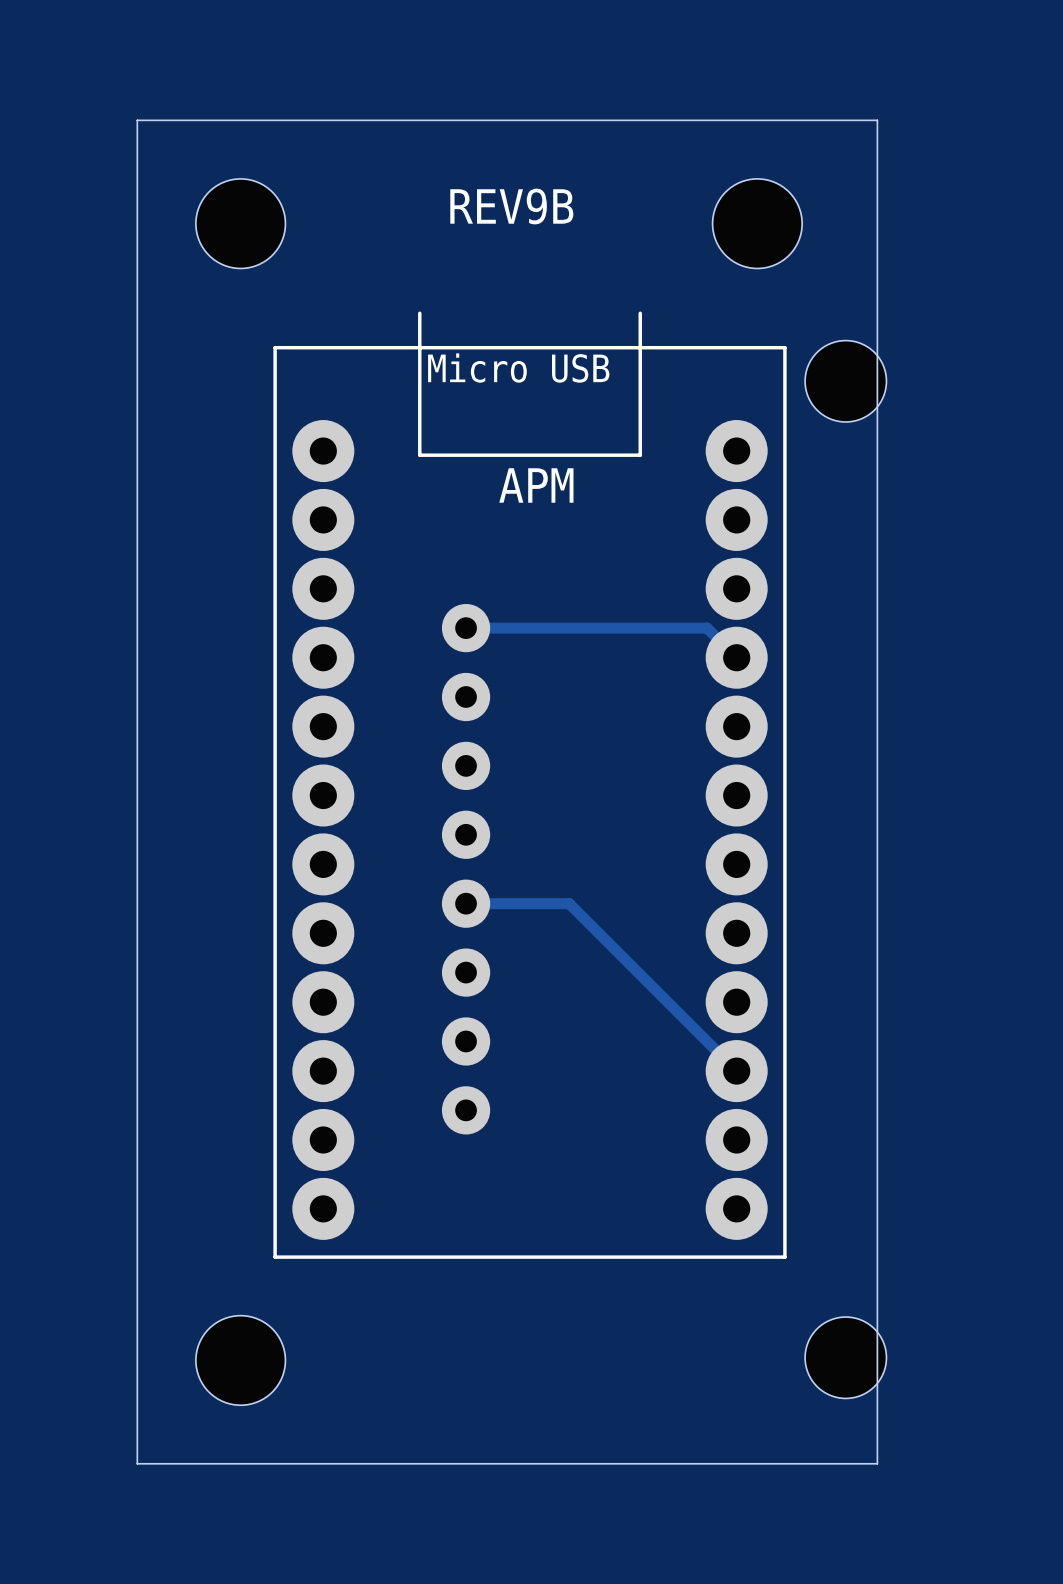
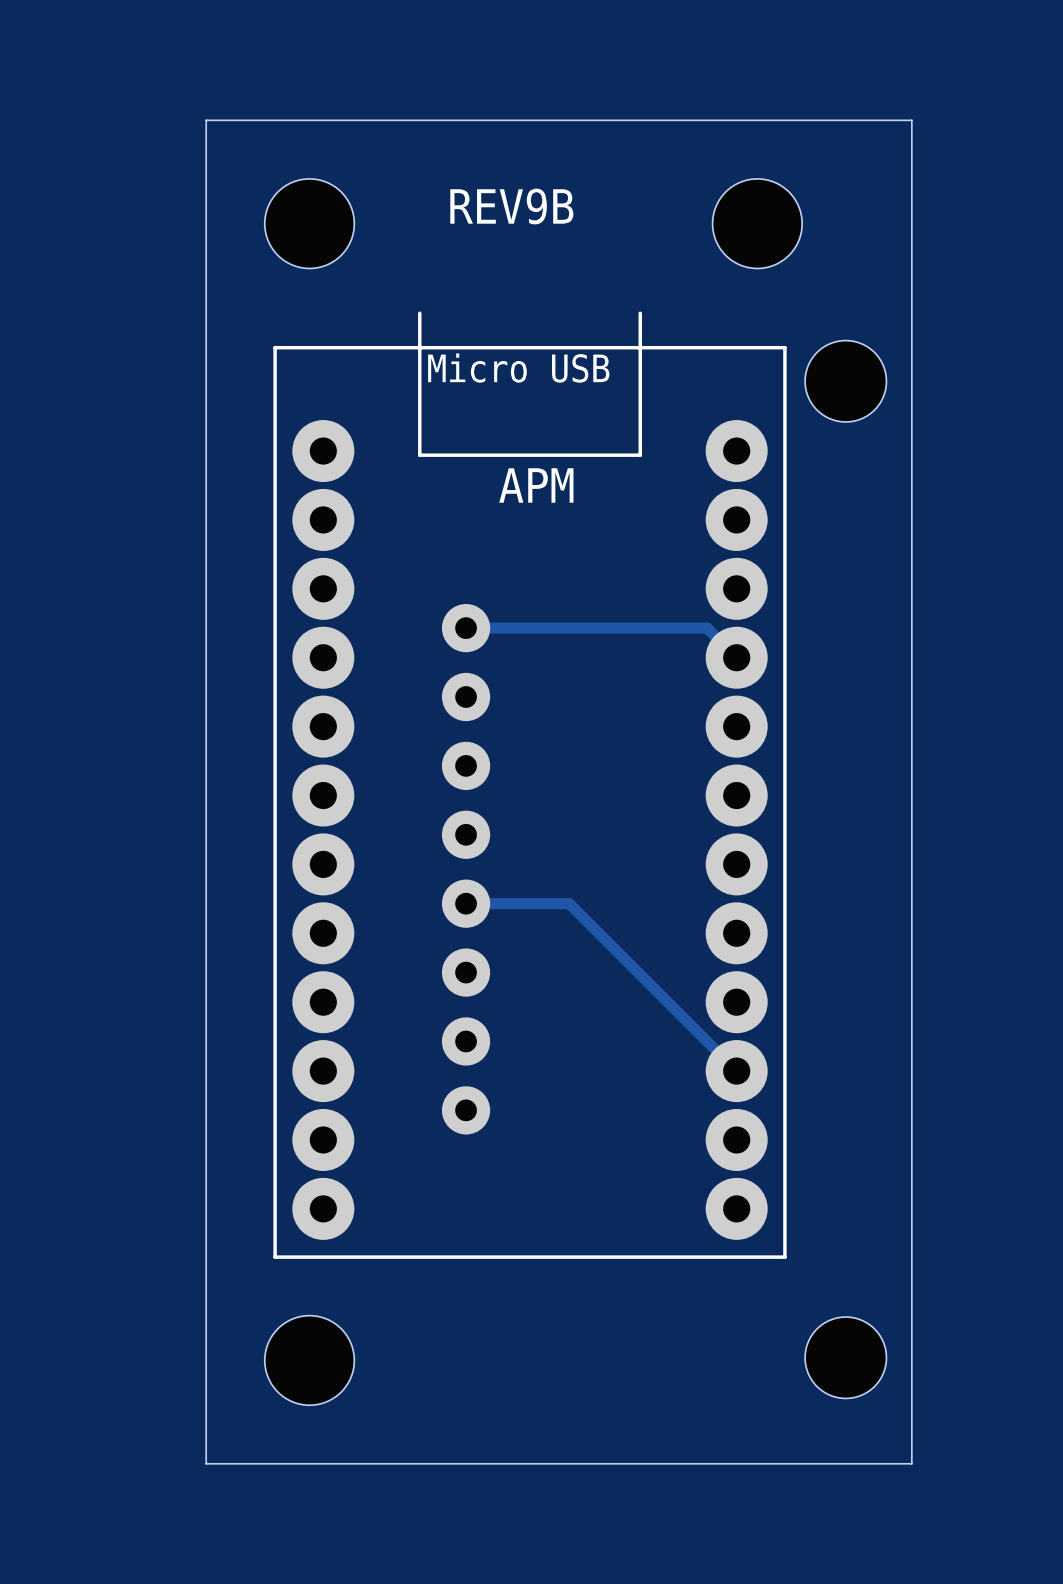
board edge: (206, 120) (137, 120) (137, 1463) (206, 1463) -> (206, 120) (206, 1463)
board edge: (877, 120) (877, 1463) -> (877, 120) (911, 120) (911, 1463) (877, 1463)
part position: (240, 223) -> (309, 223)
part position: (240, 1360) -> (309, 1360)

